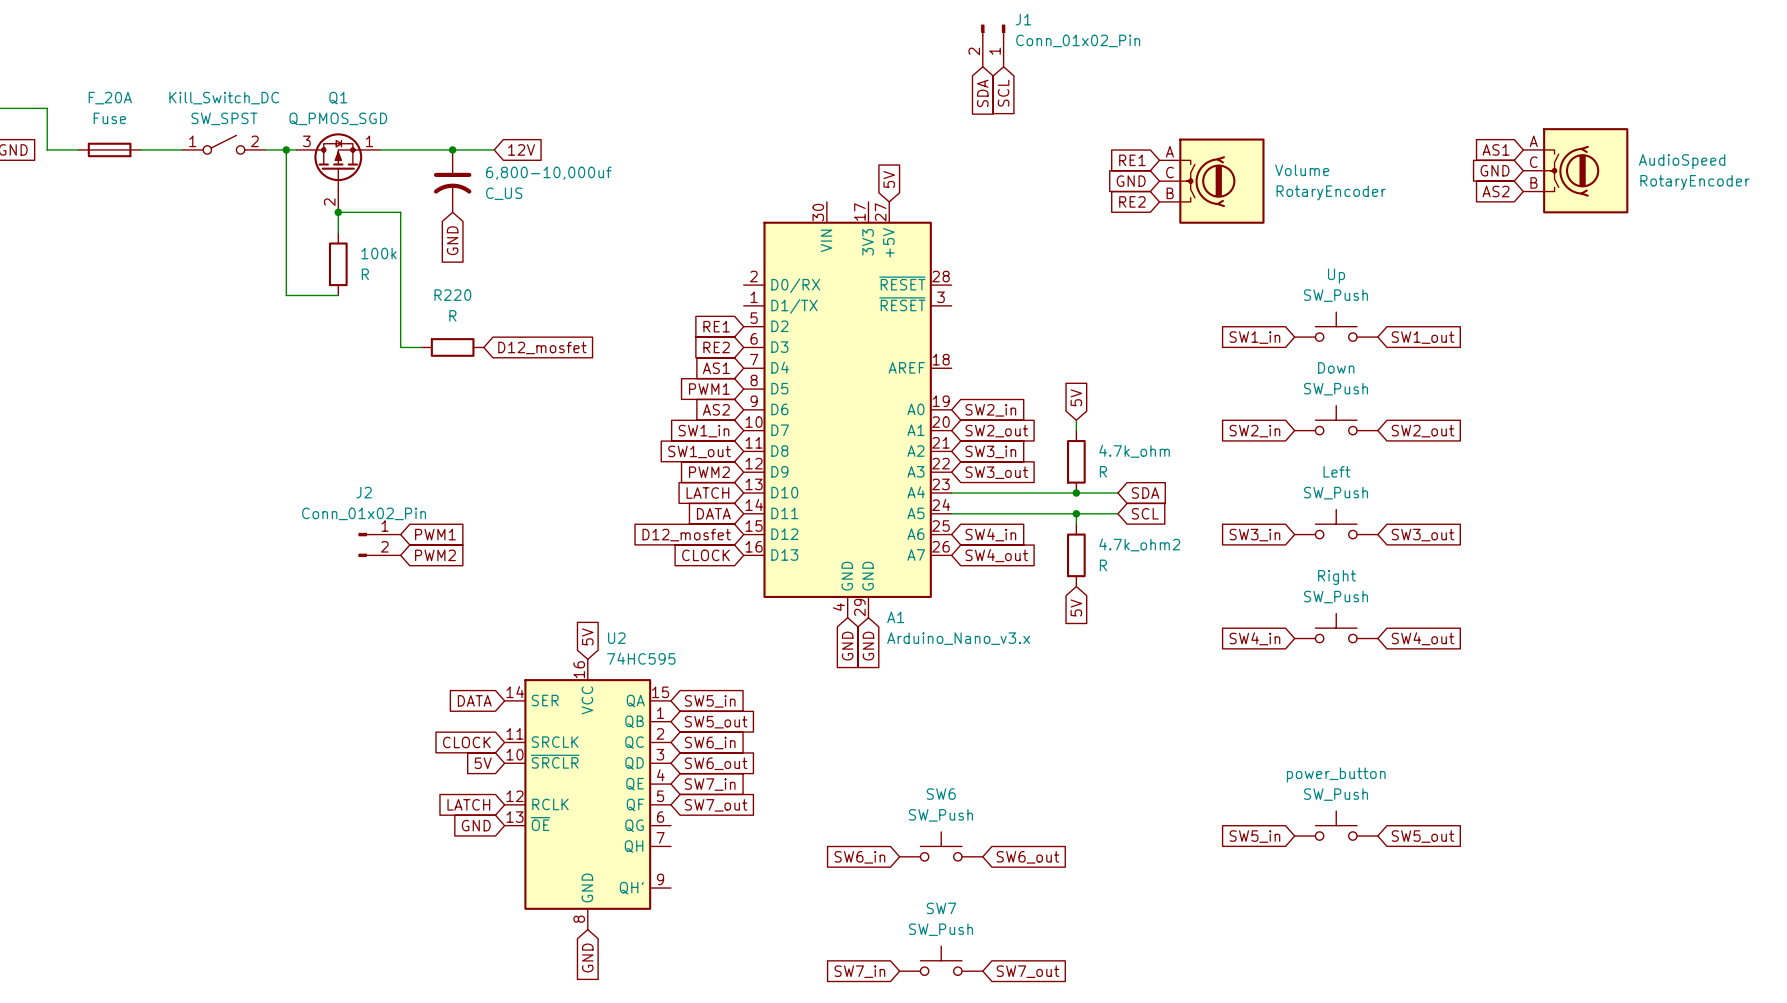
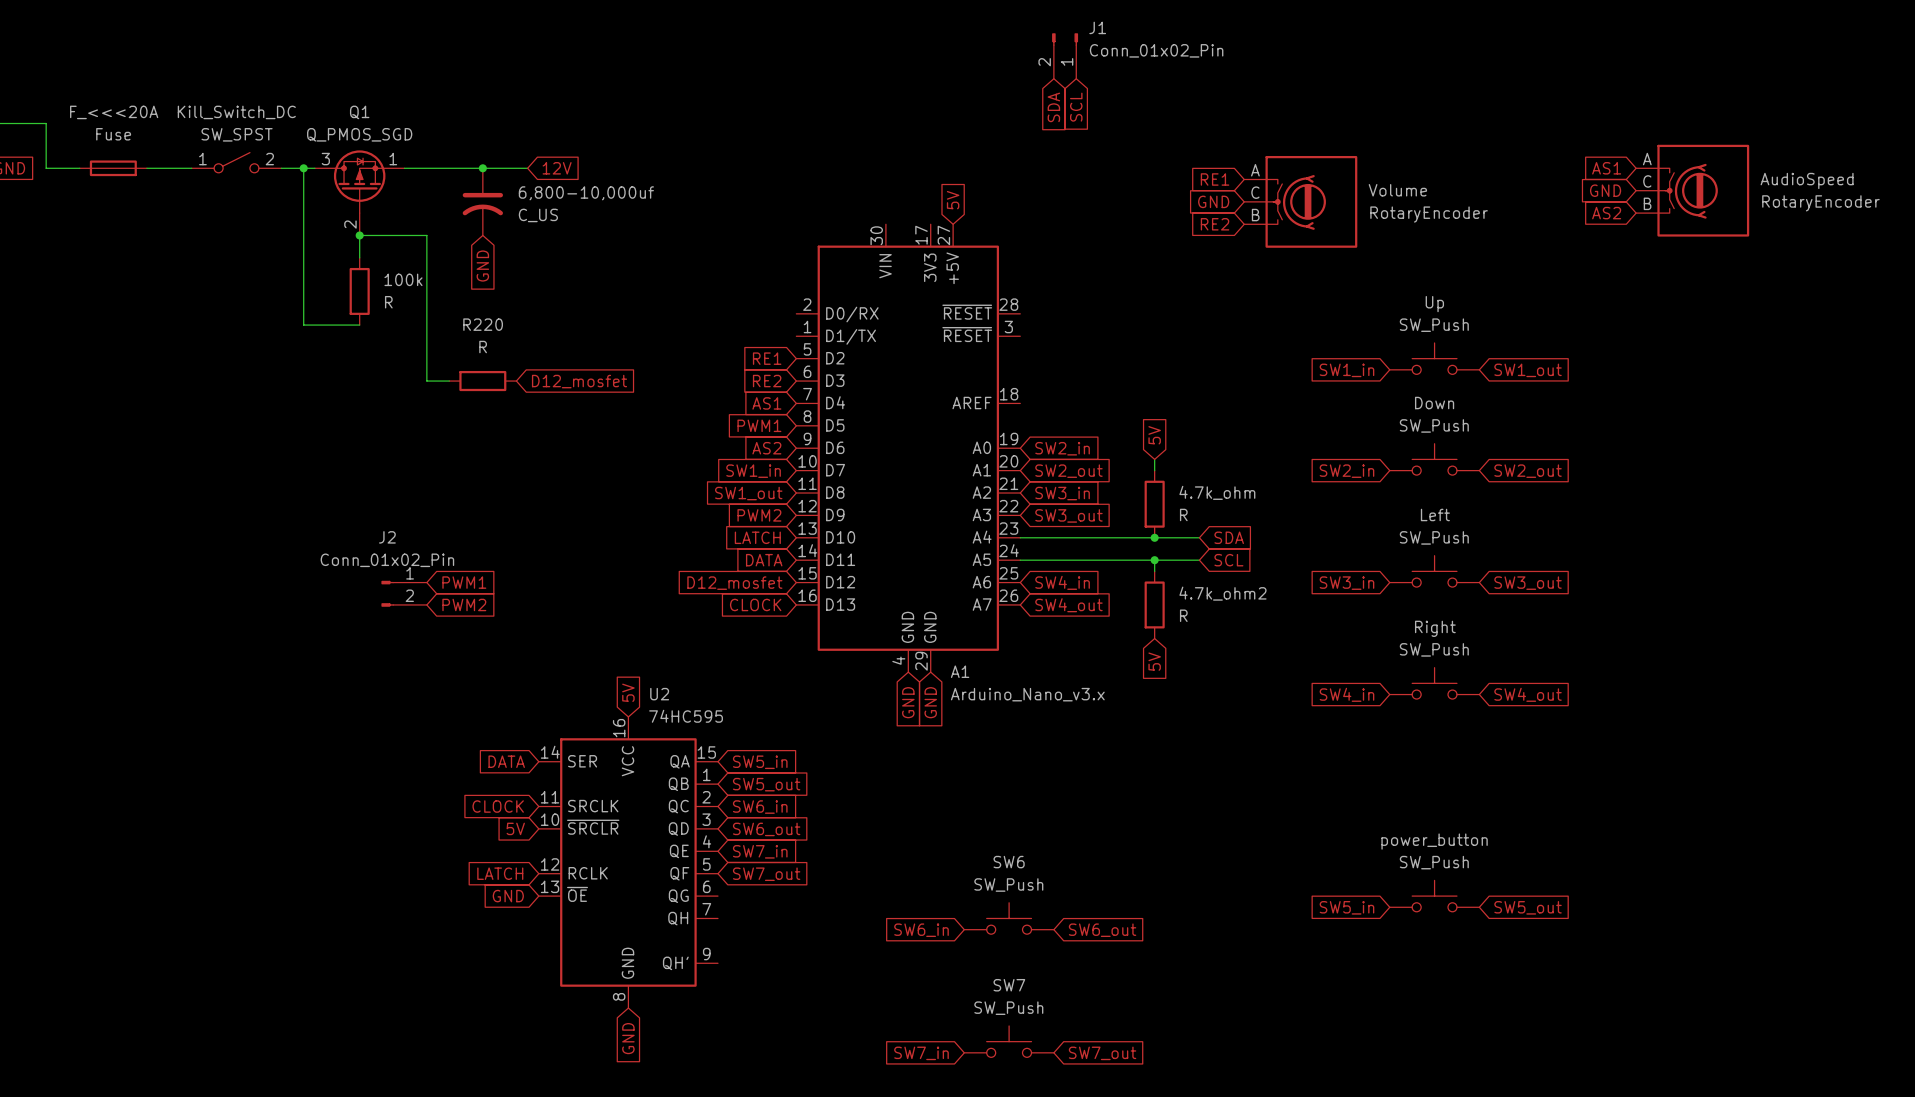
F_20A name: F_20A (110, 98) -> F_<<<20A (114, 112)

